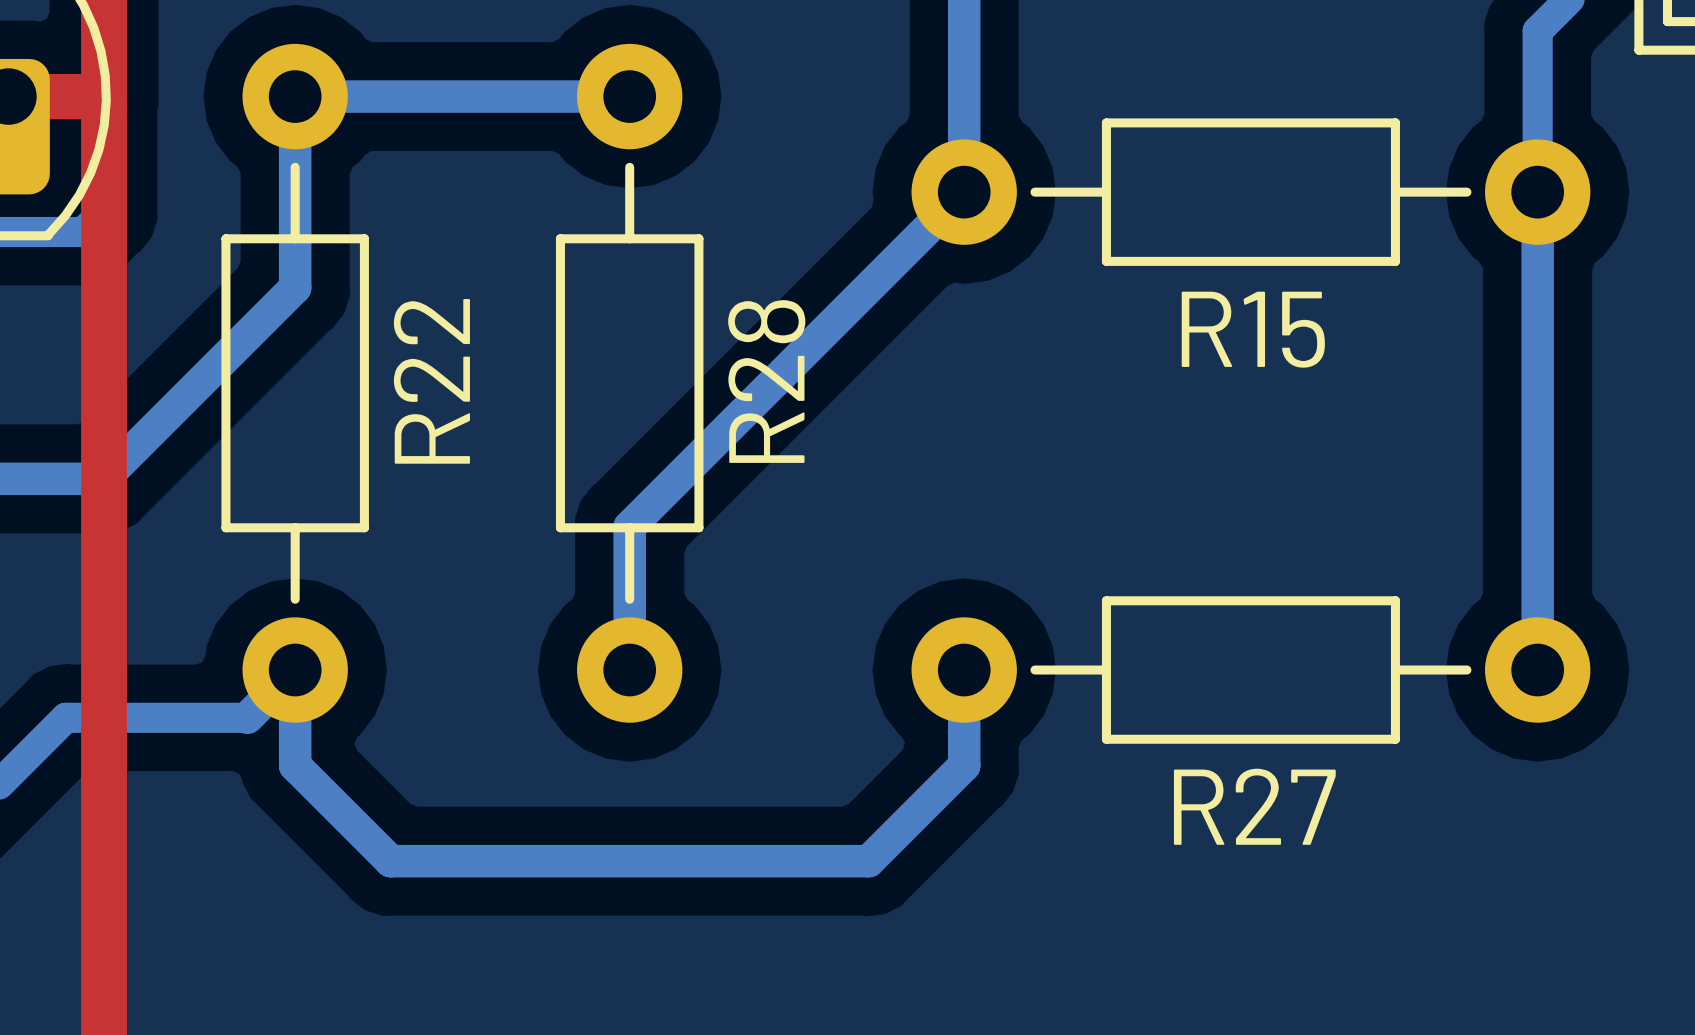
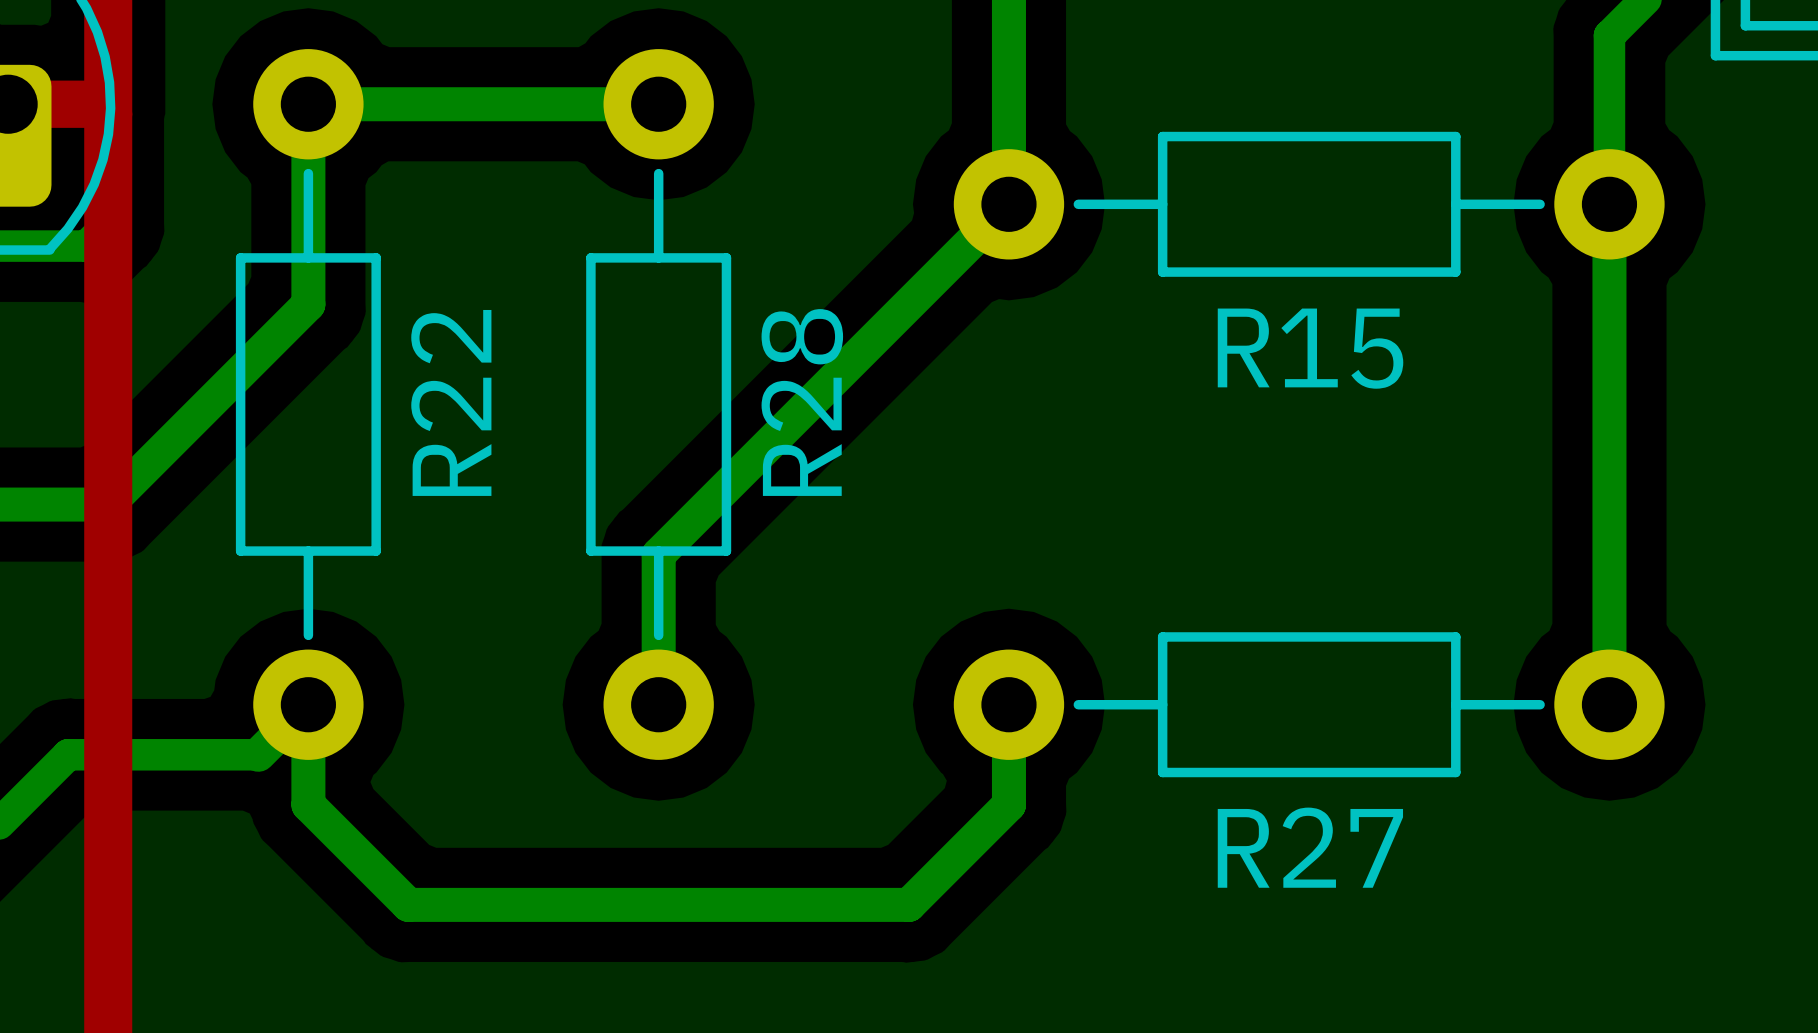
R22 footprint: [221, 43, 369, 723] -> [235, 49, 381, 760]
R28 footprint: [555, 43, 704, 723] -> [586, 49, 732, 760]
R15 footprint: [911, 118, 1591, 266] -> [953, 131, 1665, 277]
R27 footprint: [911, 596, 1591, 744] -> [953, 632, 1665, 778]

